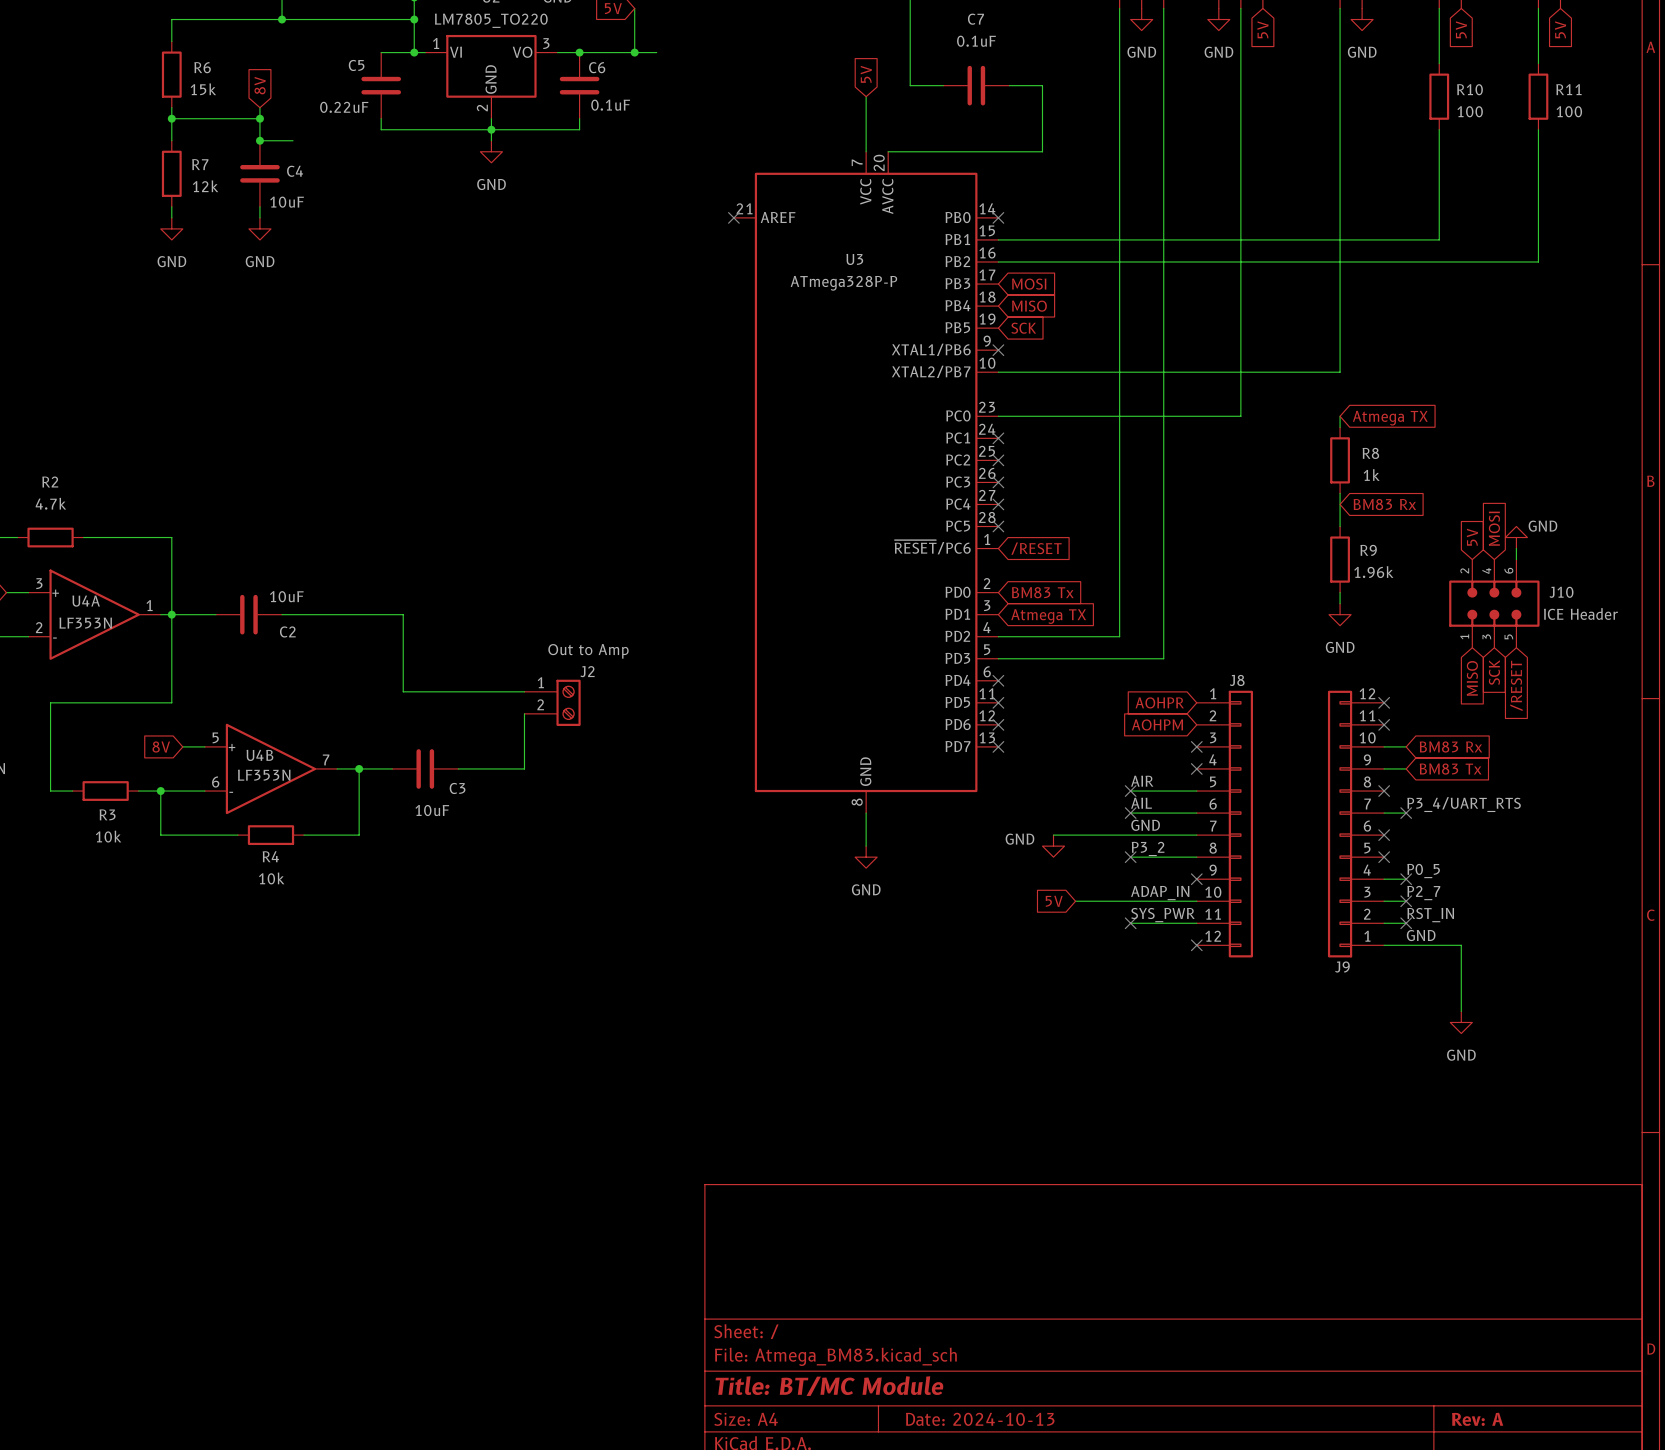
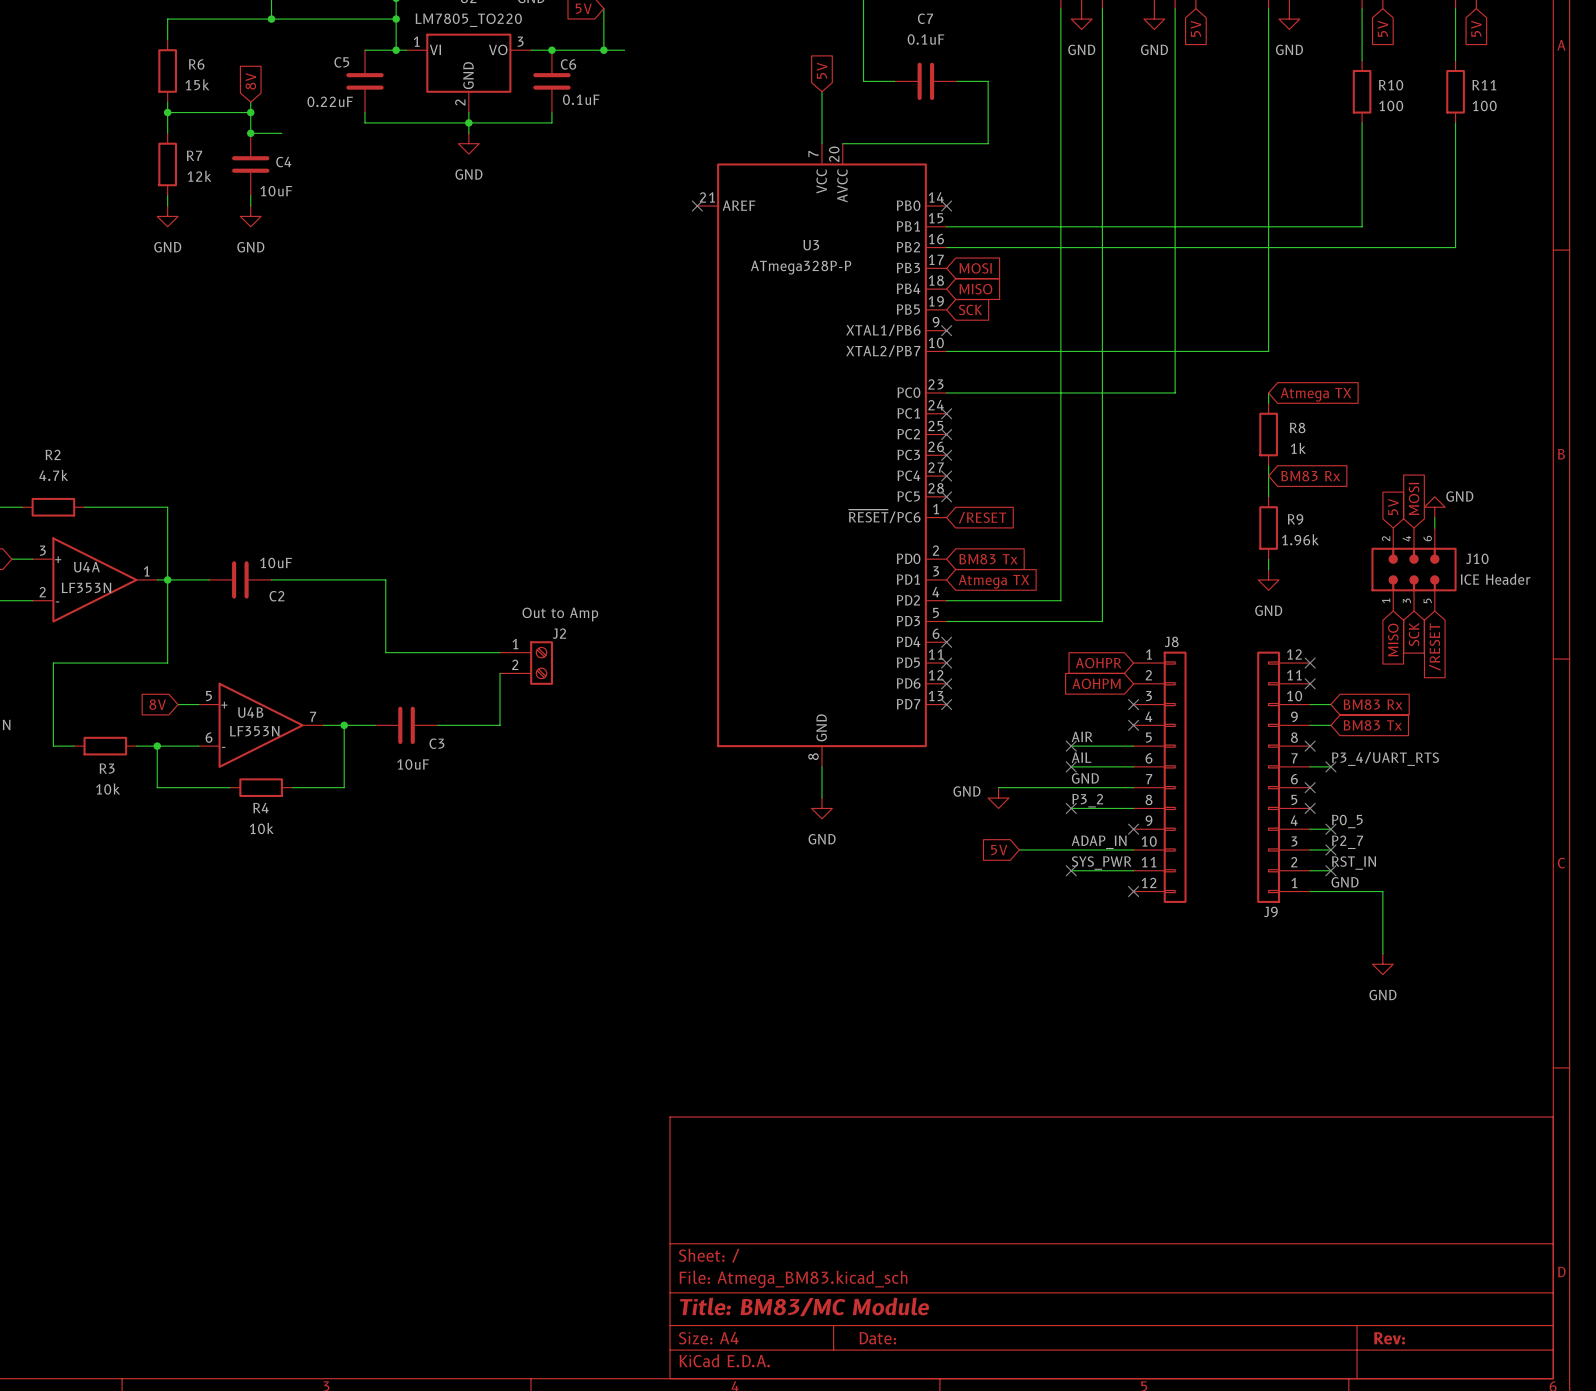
title block: Title: BT/MC Module (829, 1386) -> Title: BM83/MC Module (804, 1306)
title block: Date: 2024-10-13 (980, 1419) -> Date: (877, 1338)
title block: Rev: A (1477, 1419) -> Rev: (1389, 1338)

